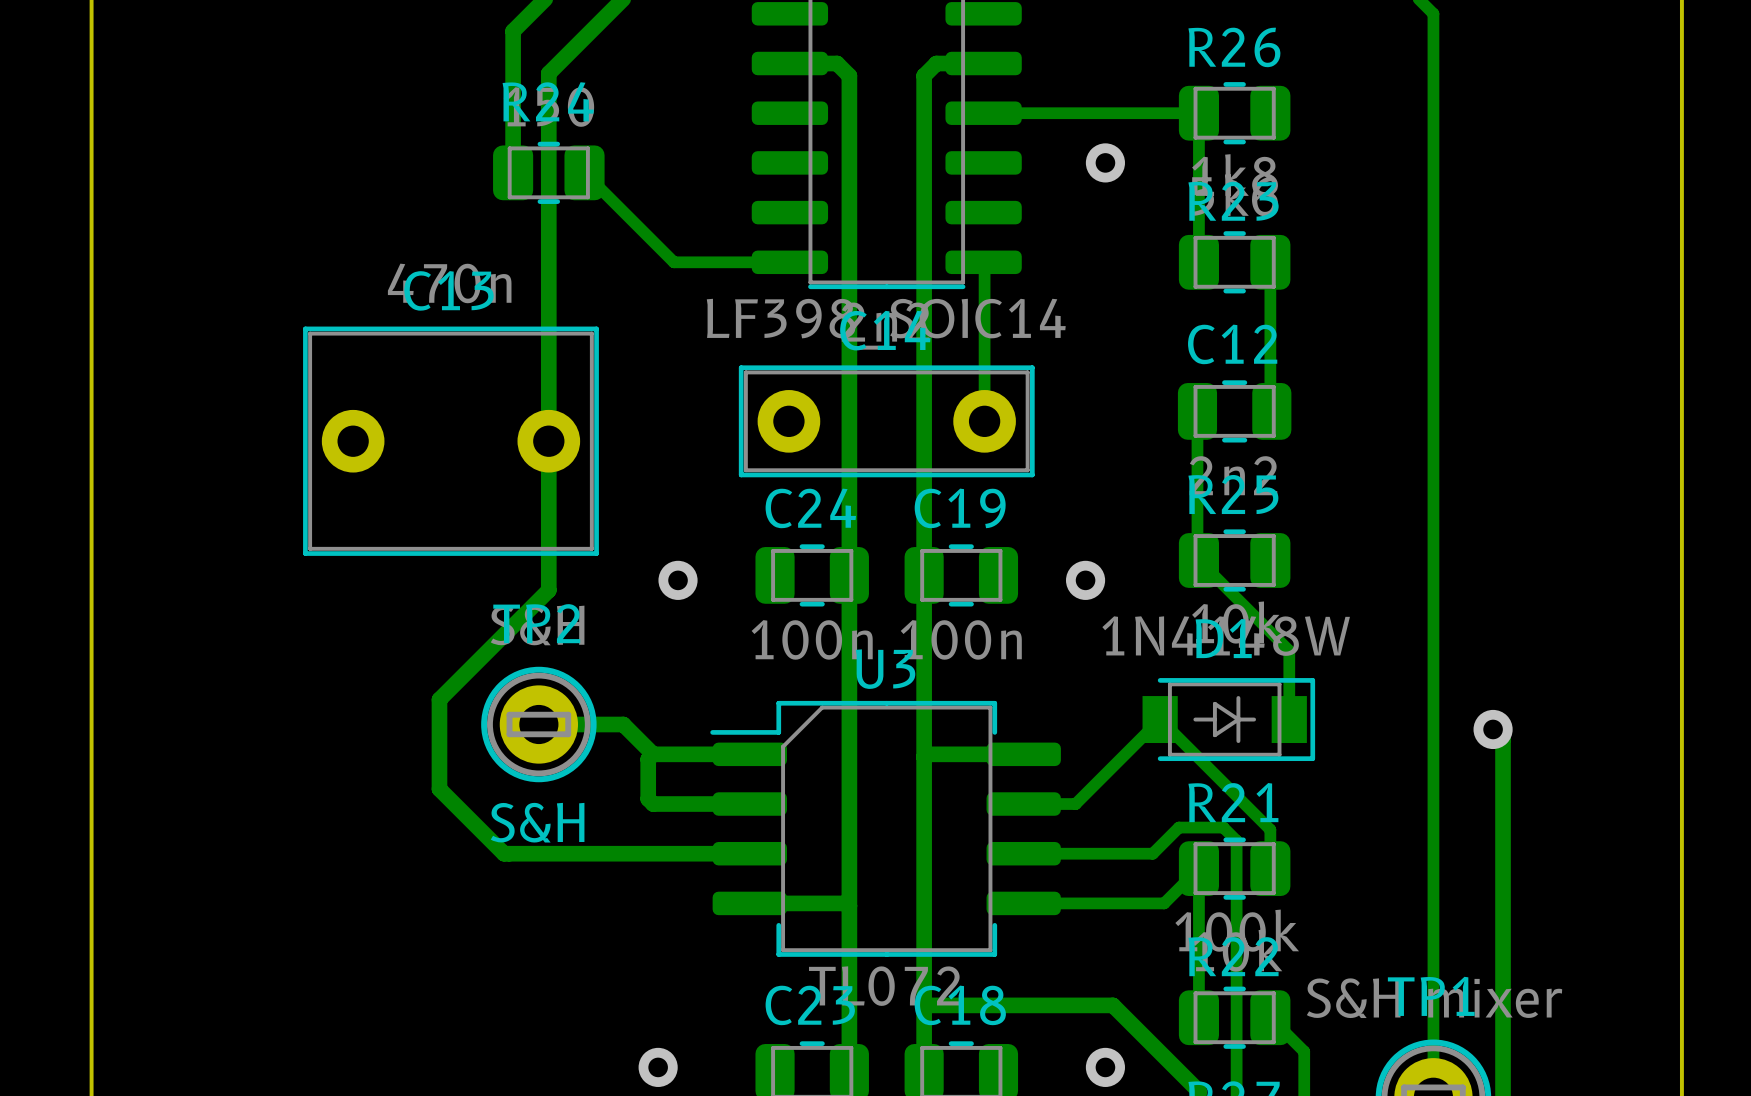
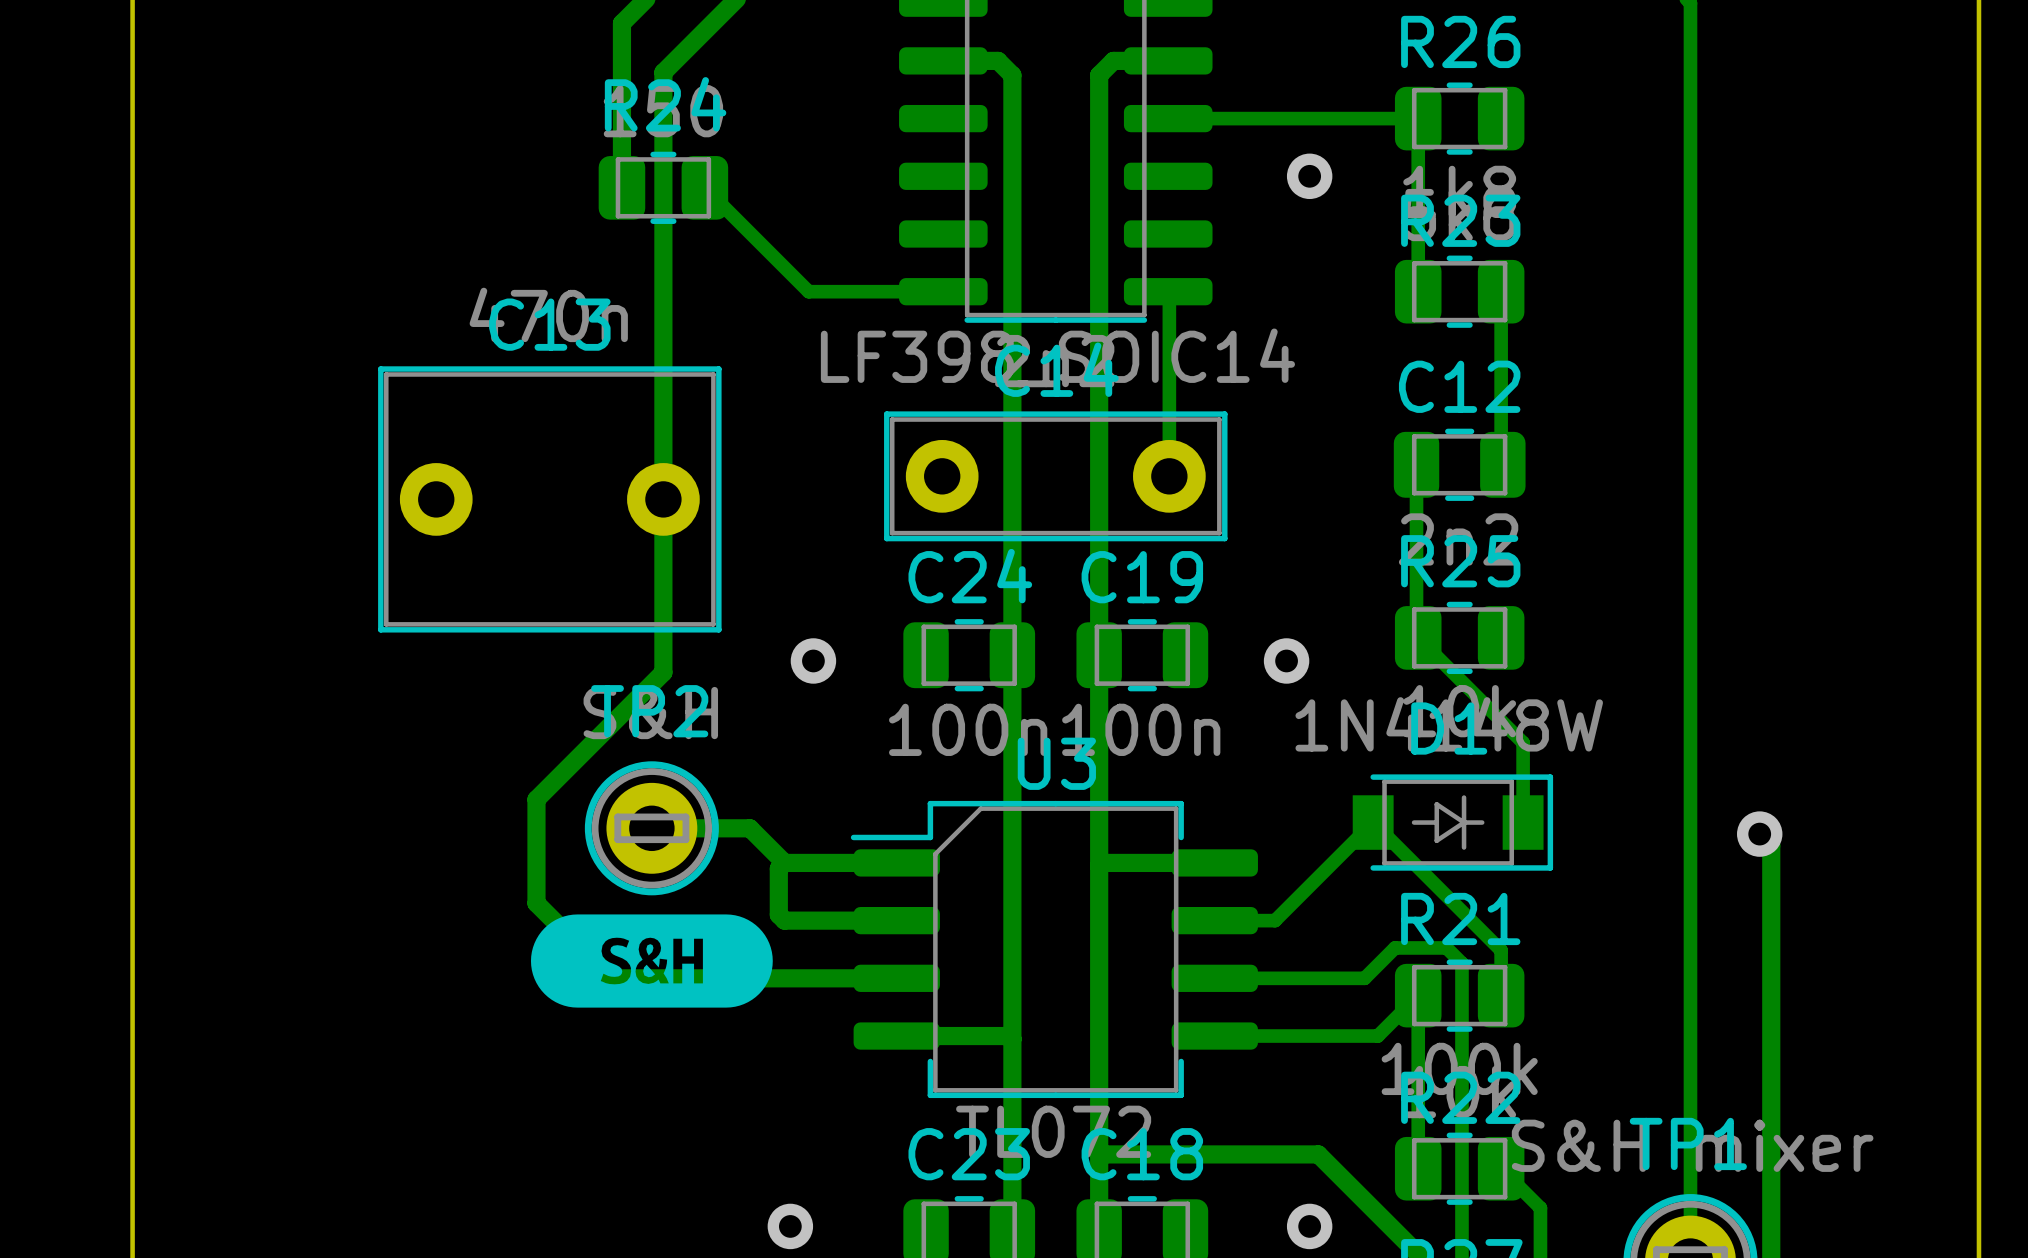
drawing: none -> [530, 914, 773, 1008]
text: S&H (537, 822) -> none

